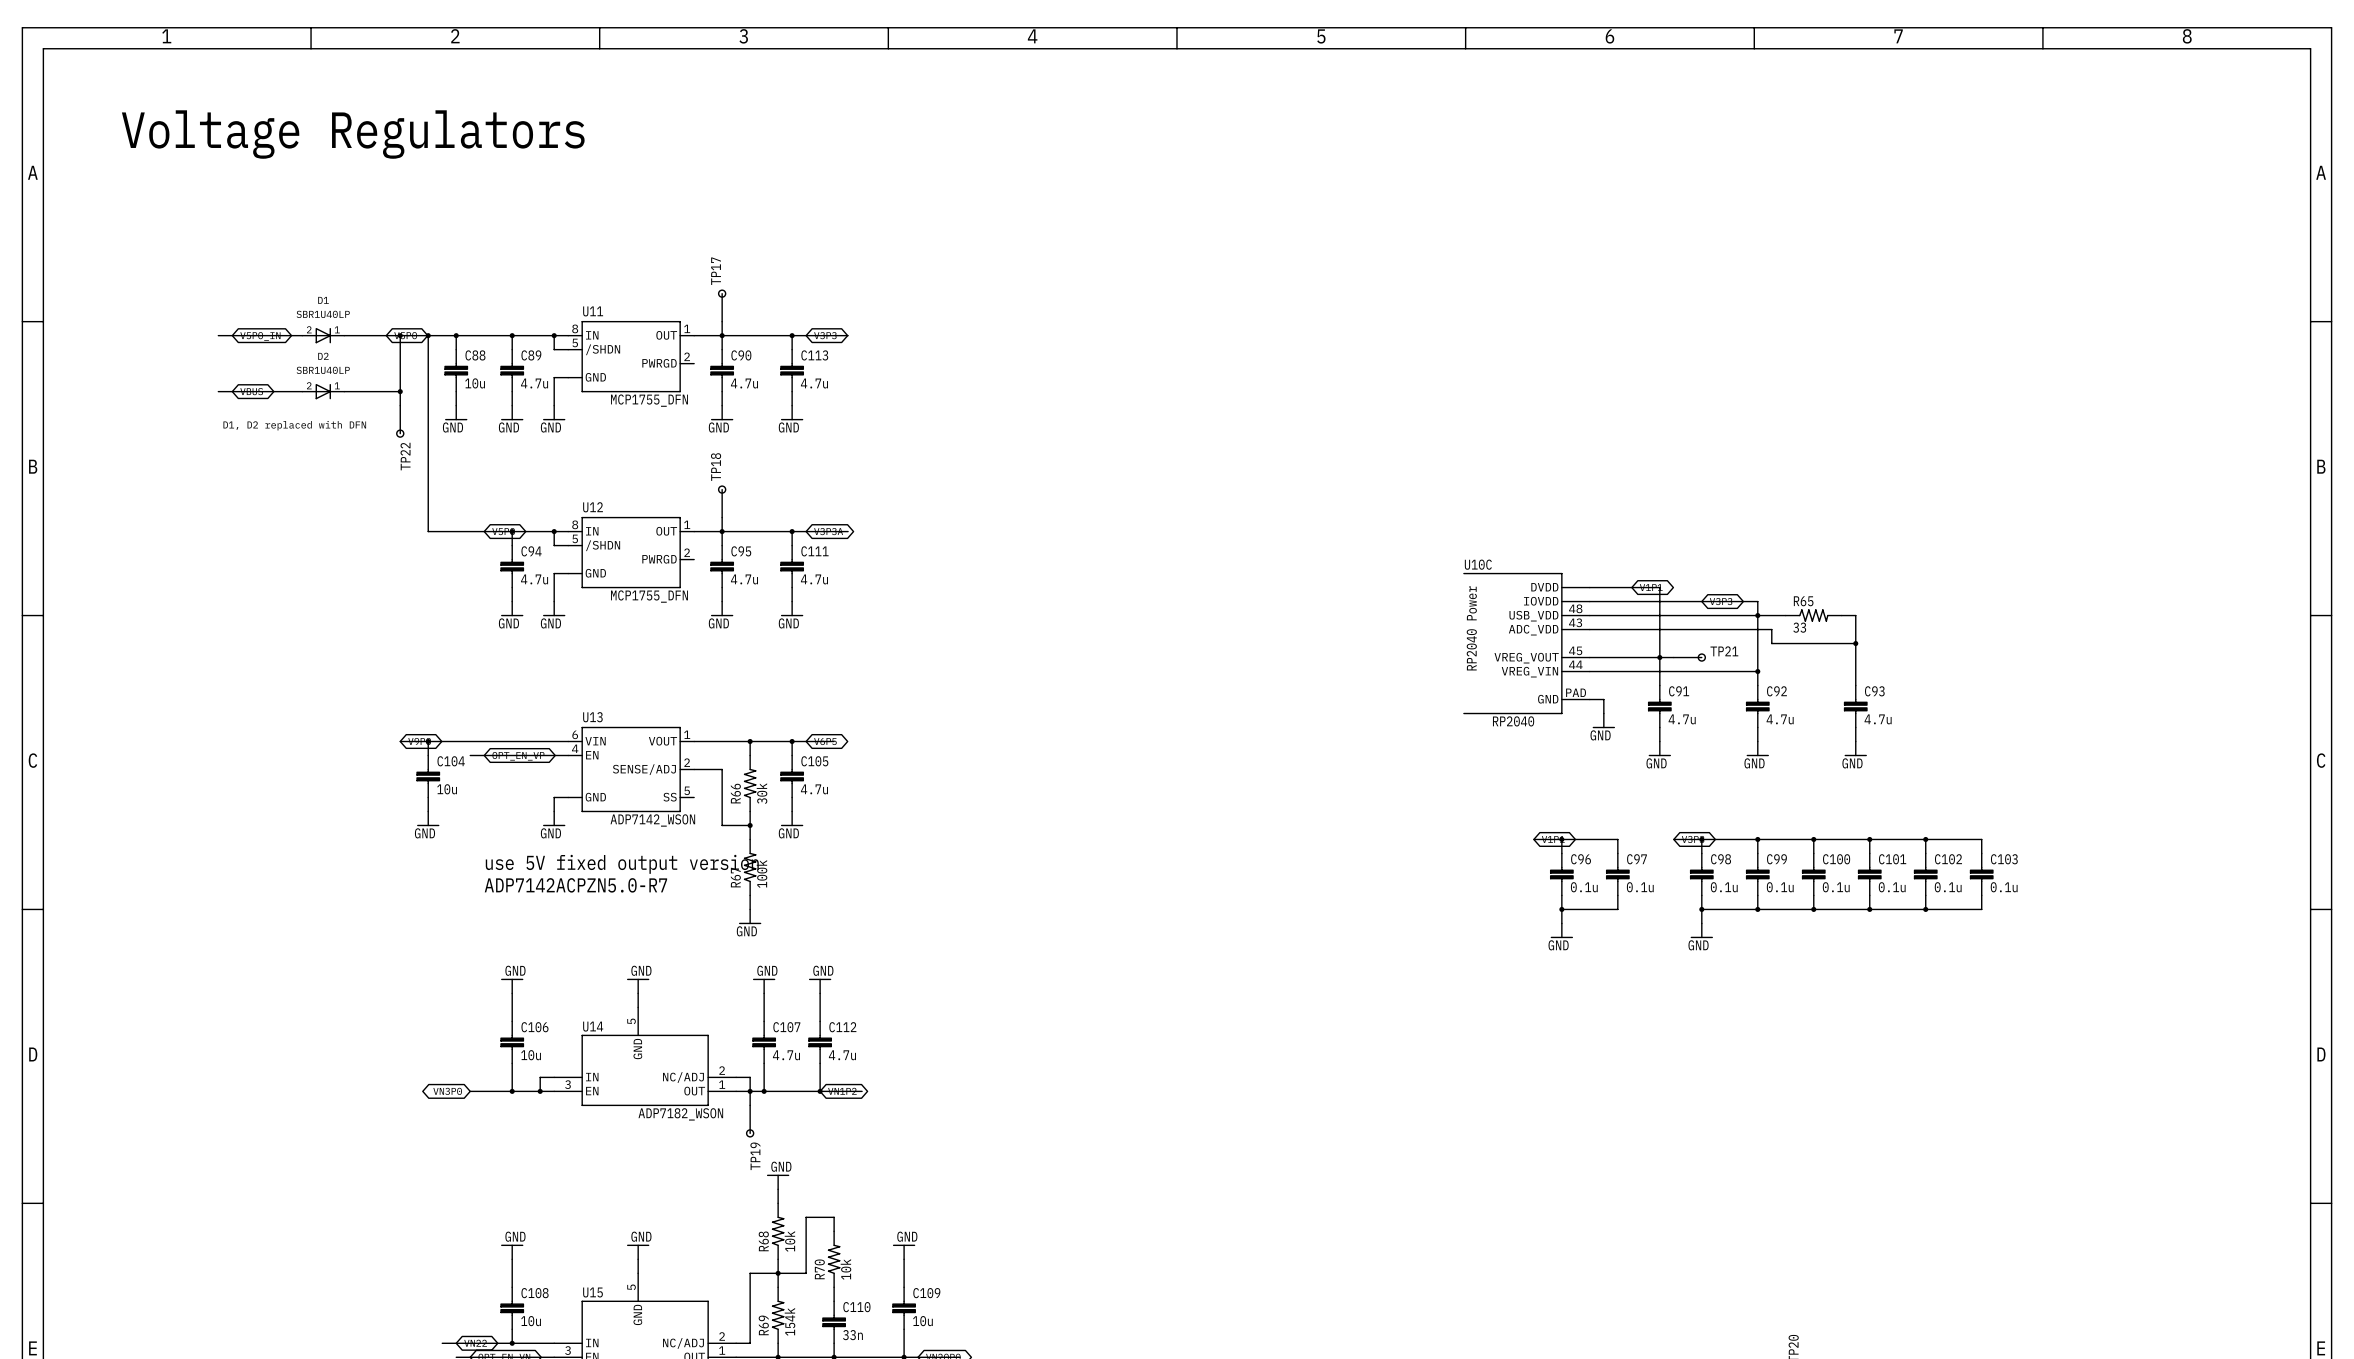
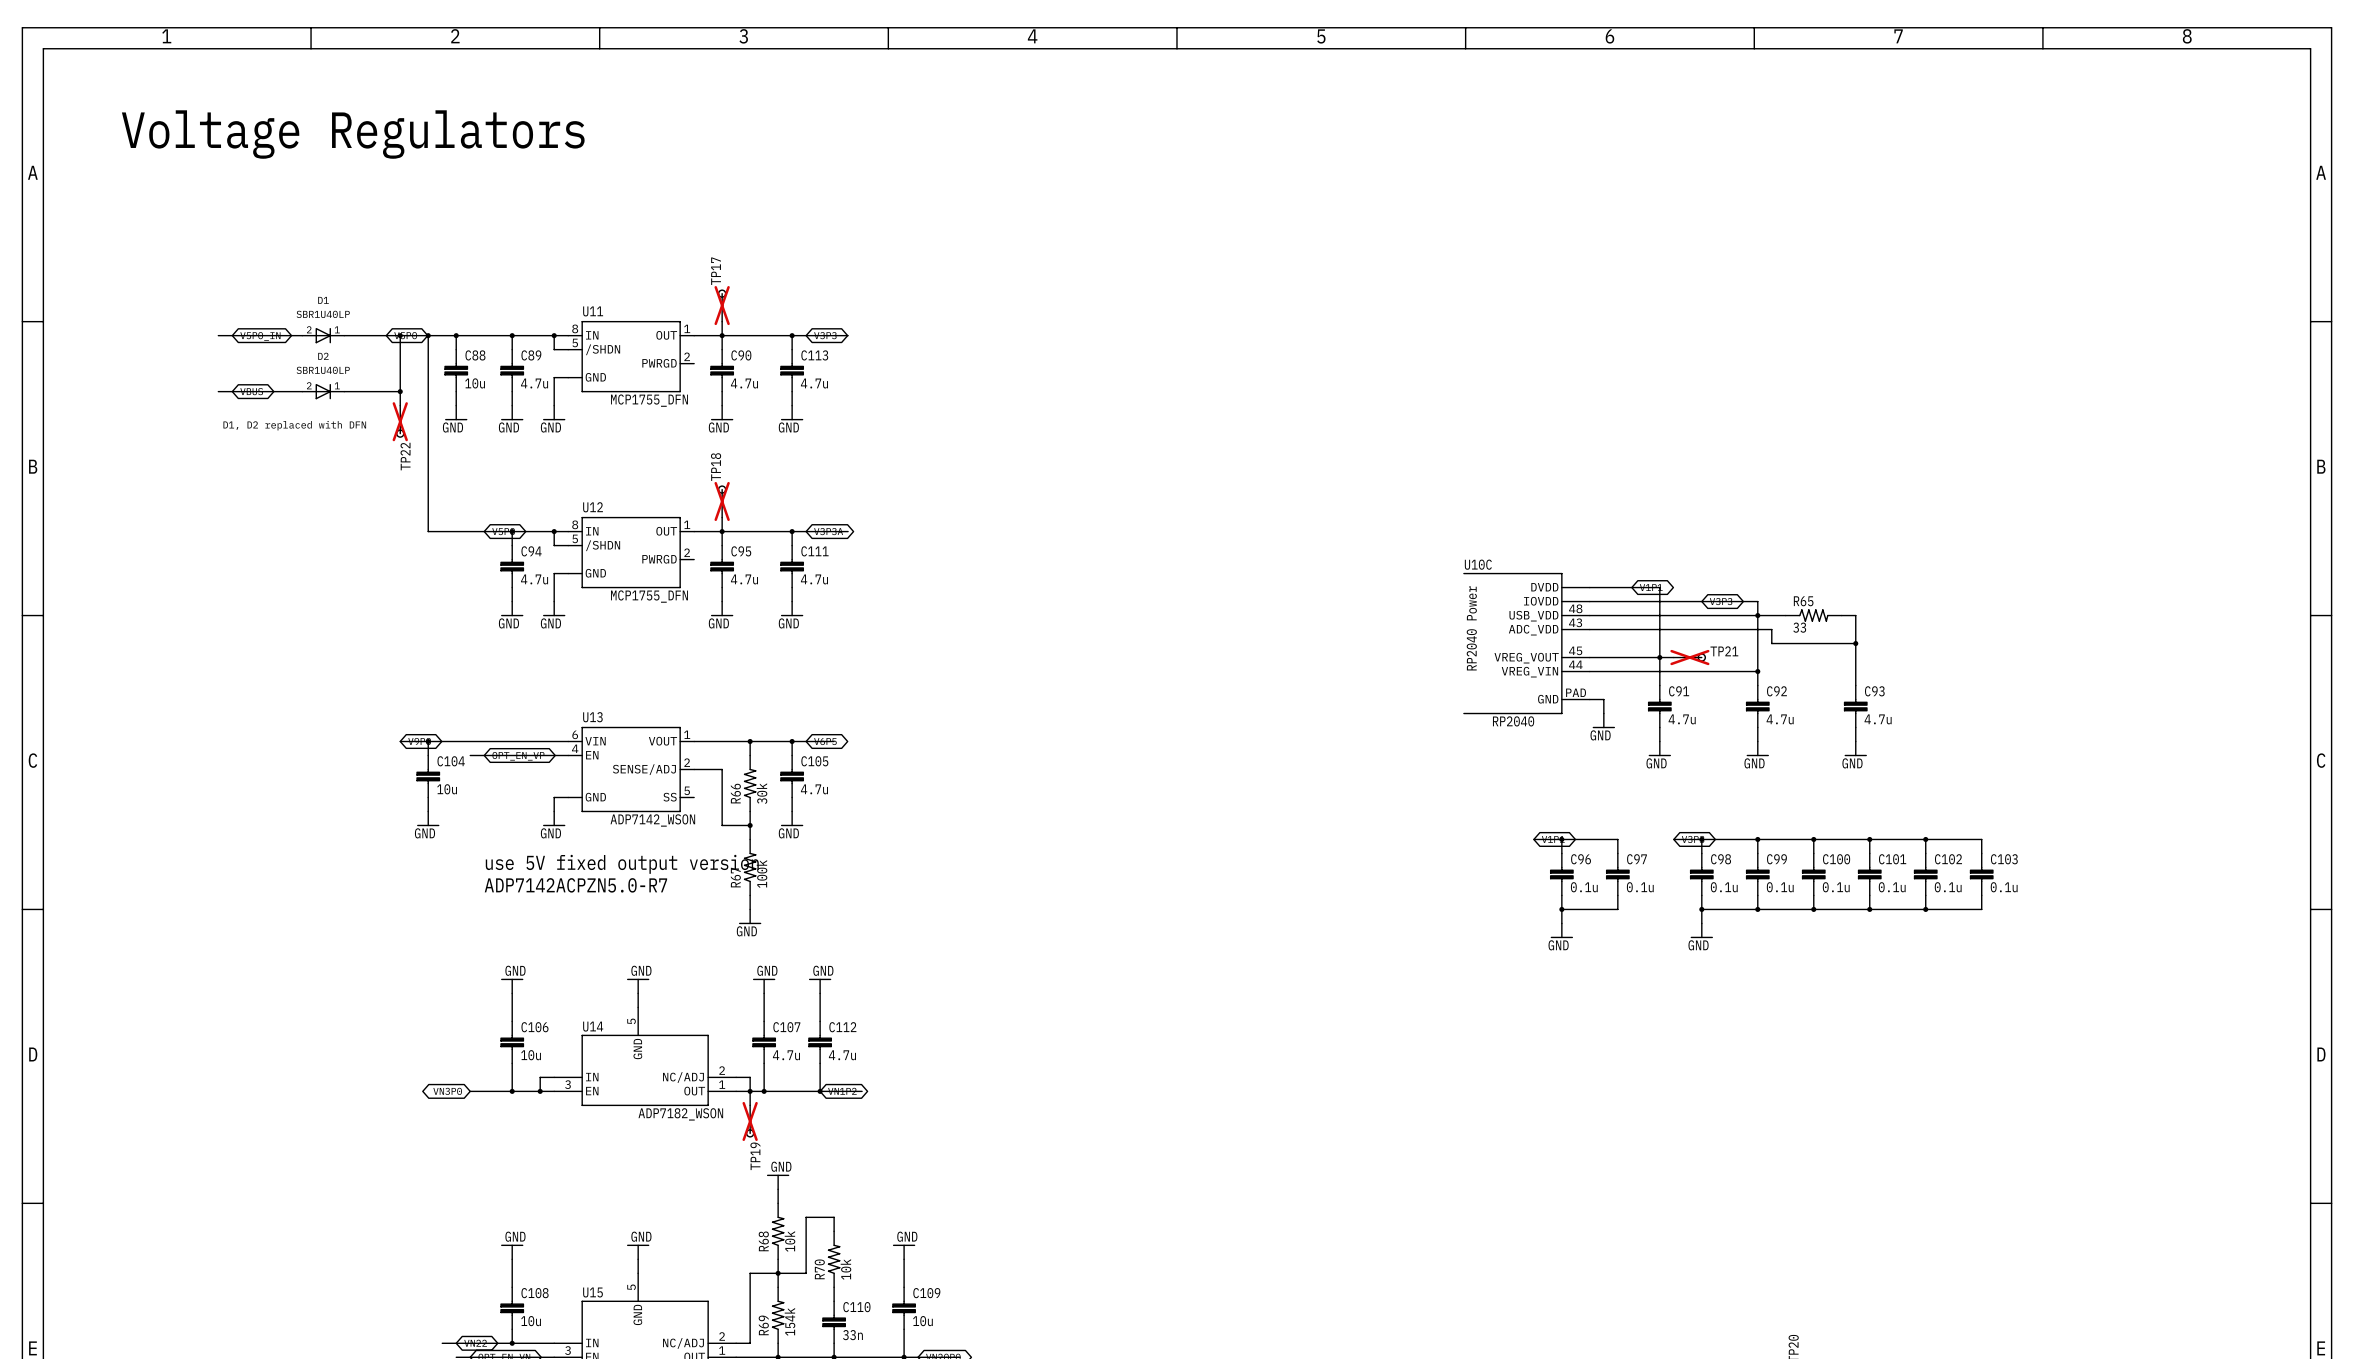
TP17 do-not-place cross: none -> (722, 305)
TP22 do-not-place cross: none -> (400, 421)
TP18 do-not-place cross: none -> (722, 501)
TP21 do-not-place cross: none -> (1689, 657)
TP19 do-not-place cross: none -> (750, 1121)

